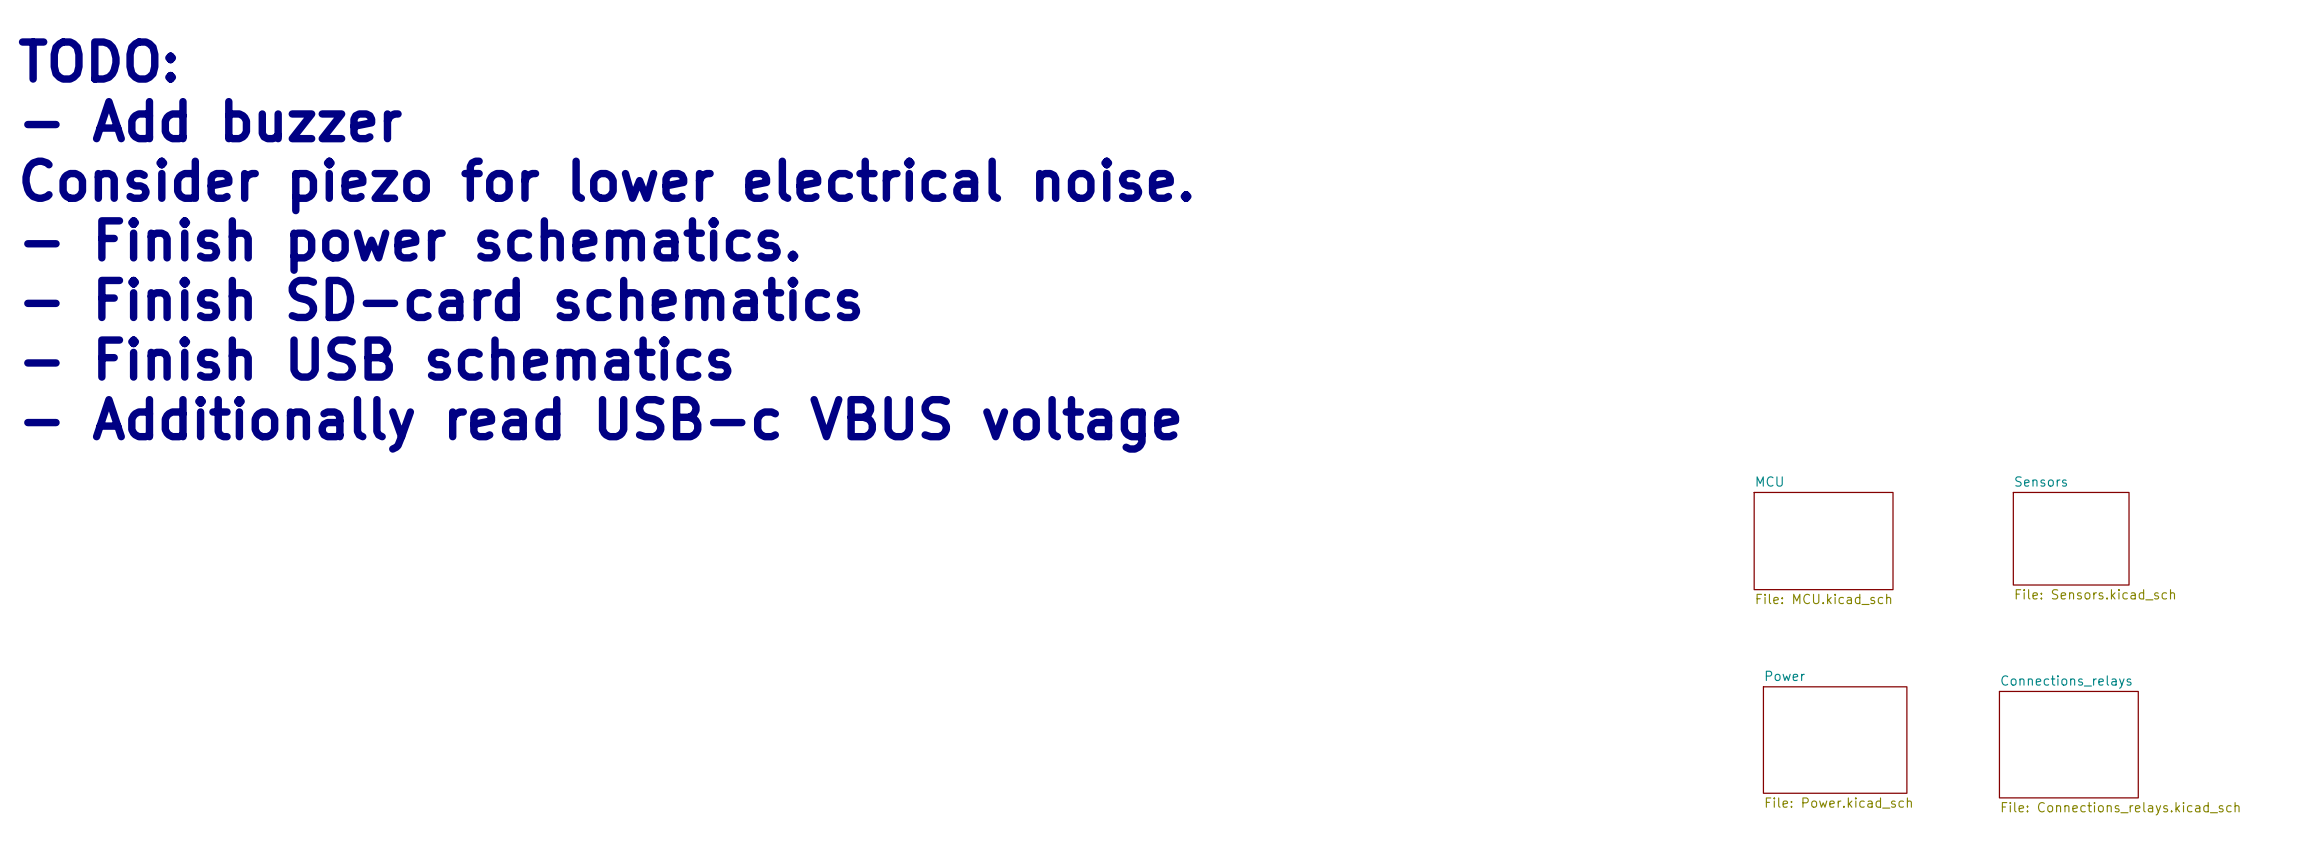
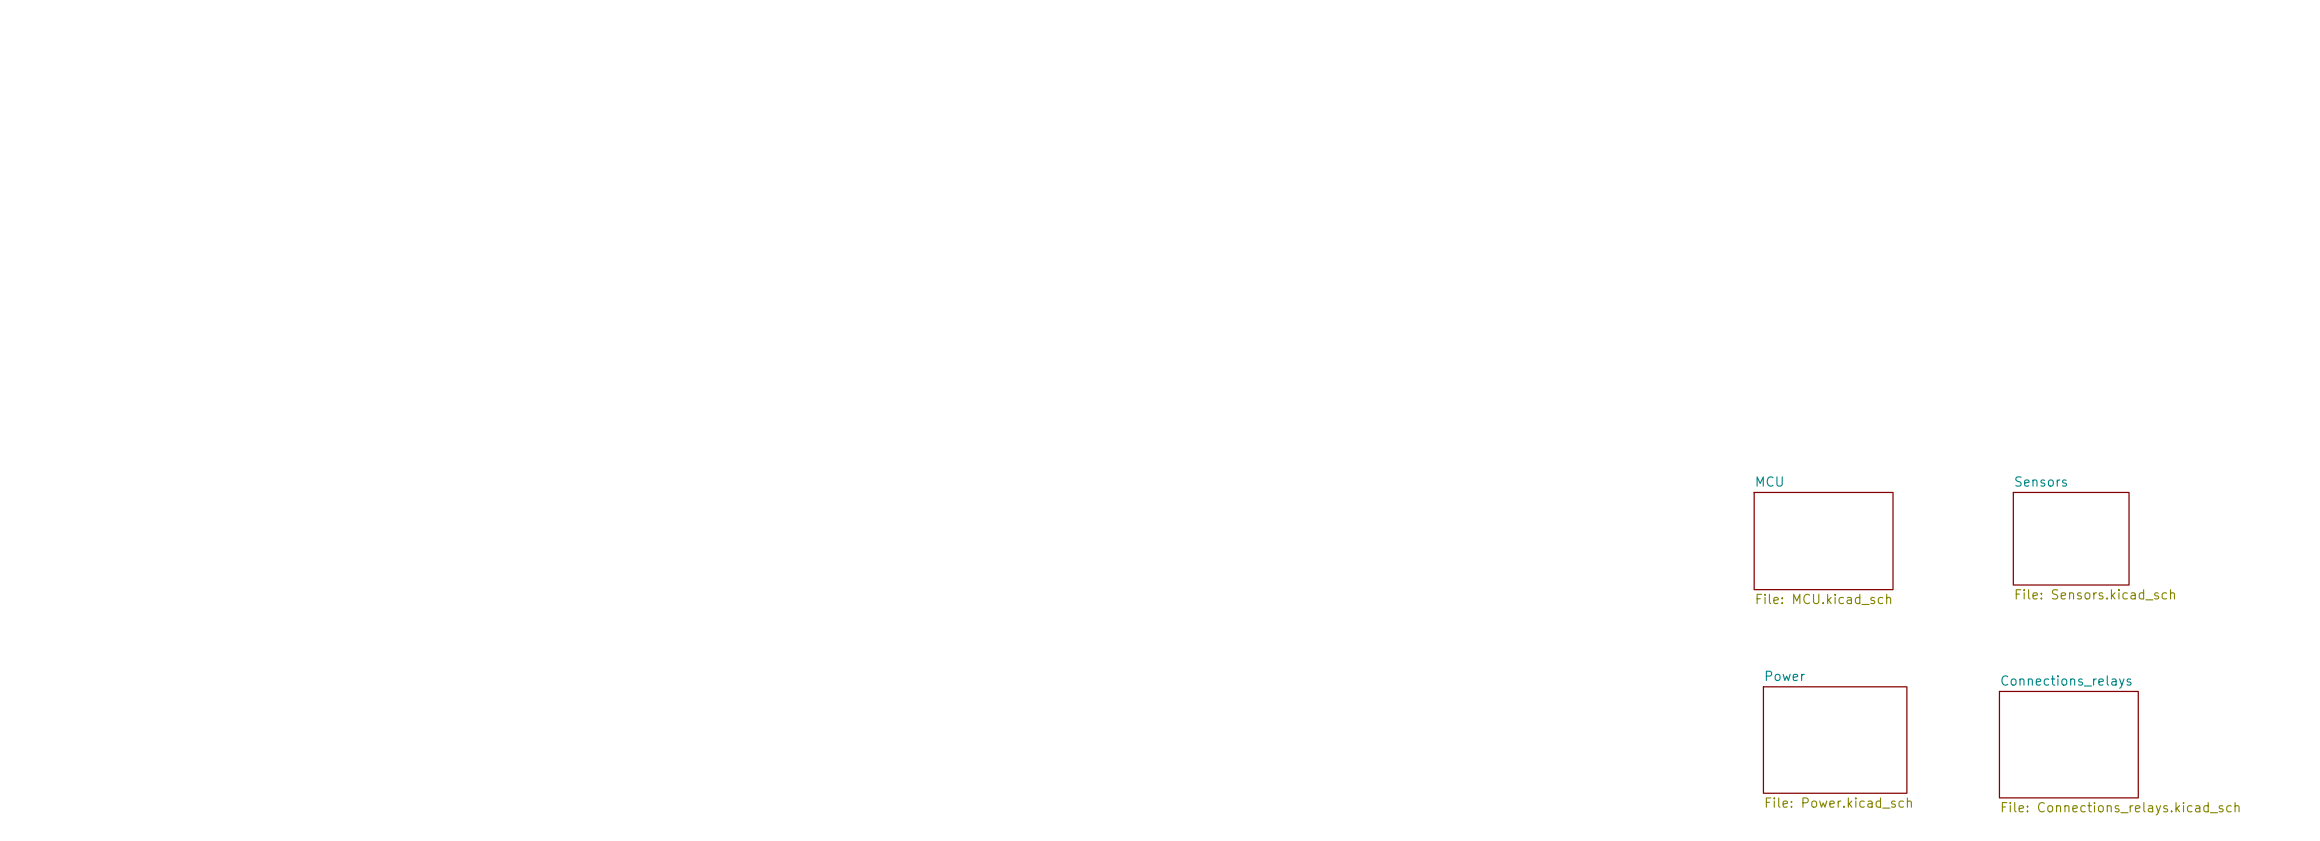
text: TODO: (97, 60) -> none
text: - Add buzzer (212, 120) -> none
text: Consider piezo for lower electrical noise. (606, 185) -> none
text: - Finish power schematics. (411, 245) -> none
text: - Finish SD-card schematics (442, 298) -> none
text: - Finish USB schematics (377, 358) -> none
text: - Additionally read USB-c VBUS voltage (601, 424) -> none

